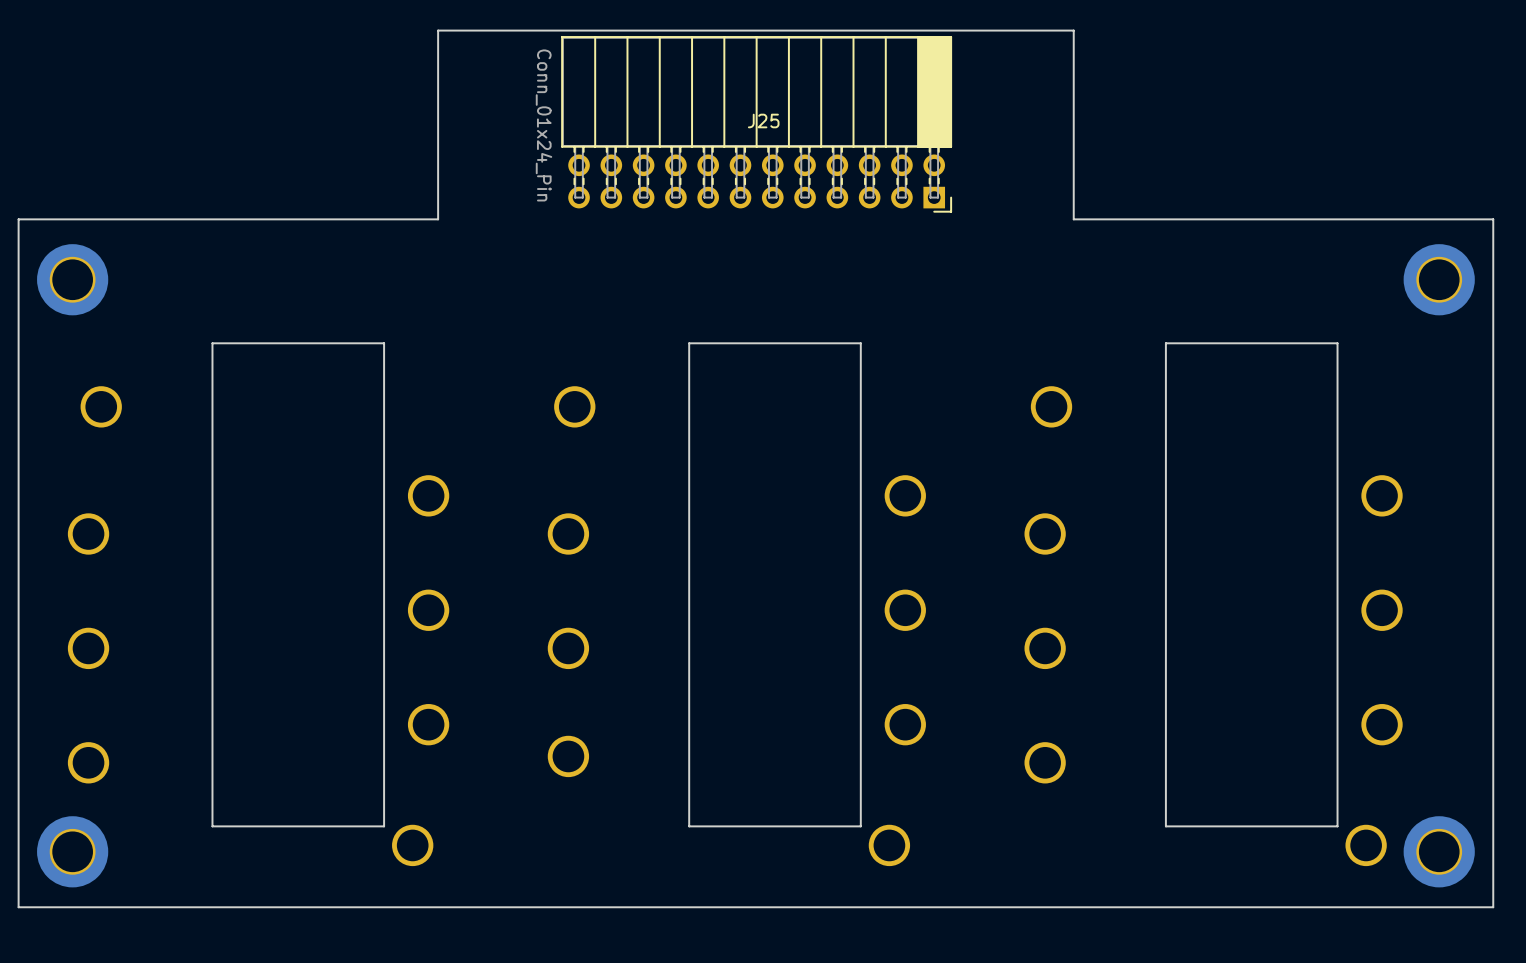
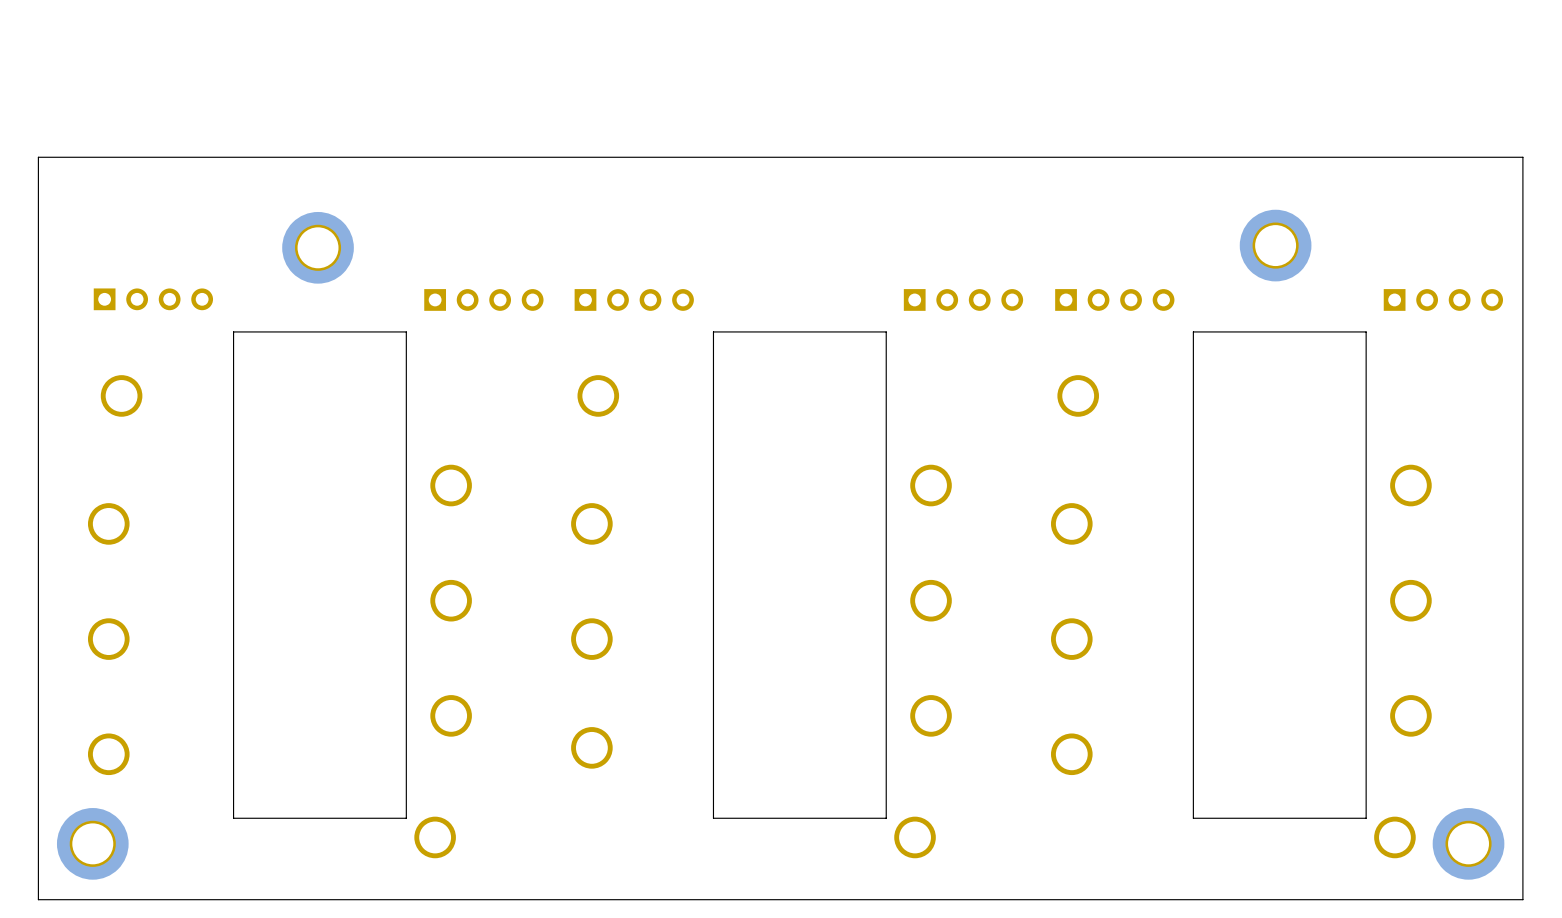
J25: Conn_01x24_Pin (756, 124) -> none
board edge: (1493, 219) (1073, 219) (1073, 30) (438, 30) (438, 219) (18, 219) -> (1522, 207) (1522, 157) (38, 157) (38, 207)
part position: (72, 279) -> (318, 247)
part position: (1439, 279) -> (1275, 245)
part: none -> (153, 299)
part: none -> (483, 299)
part: none -> (634, 299)
part: none -> (963, 299)
part: none -> (1114, 299)
part: none -> (1443, 299)

